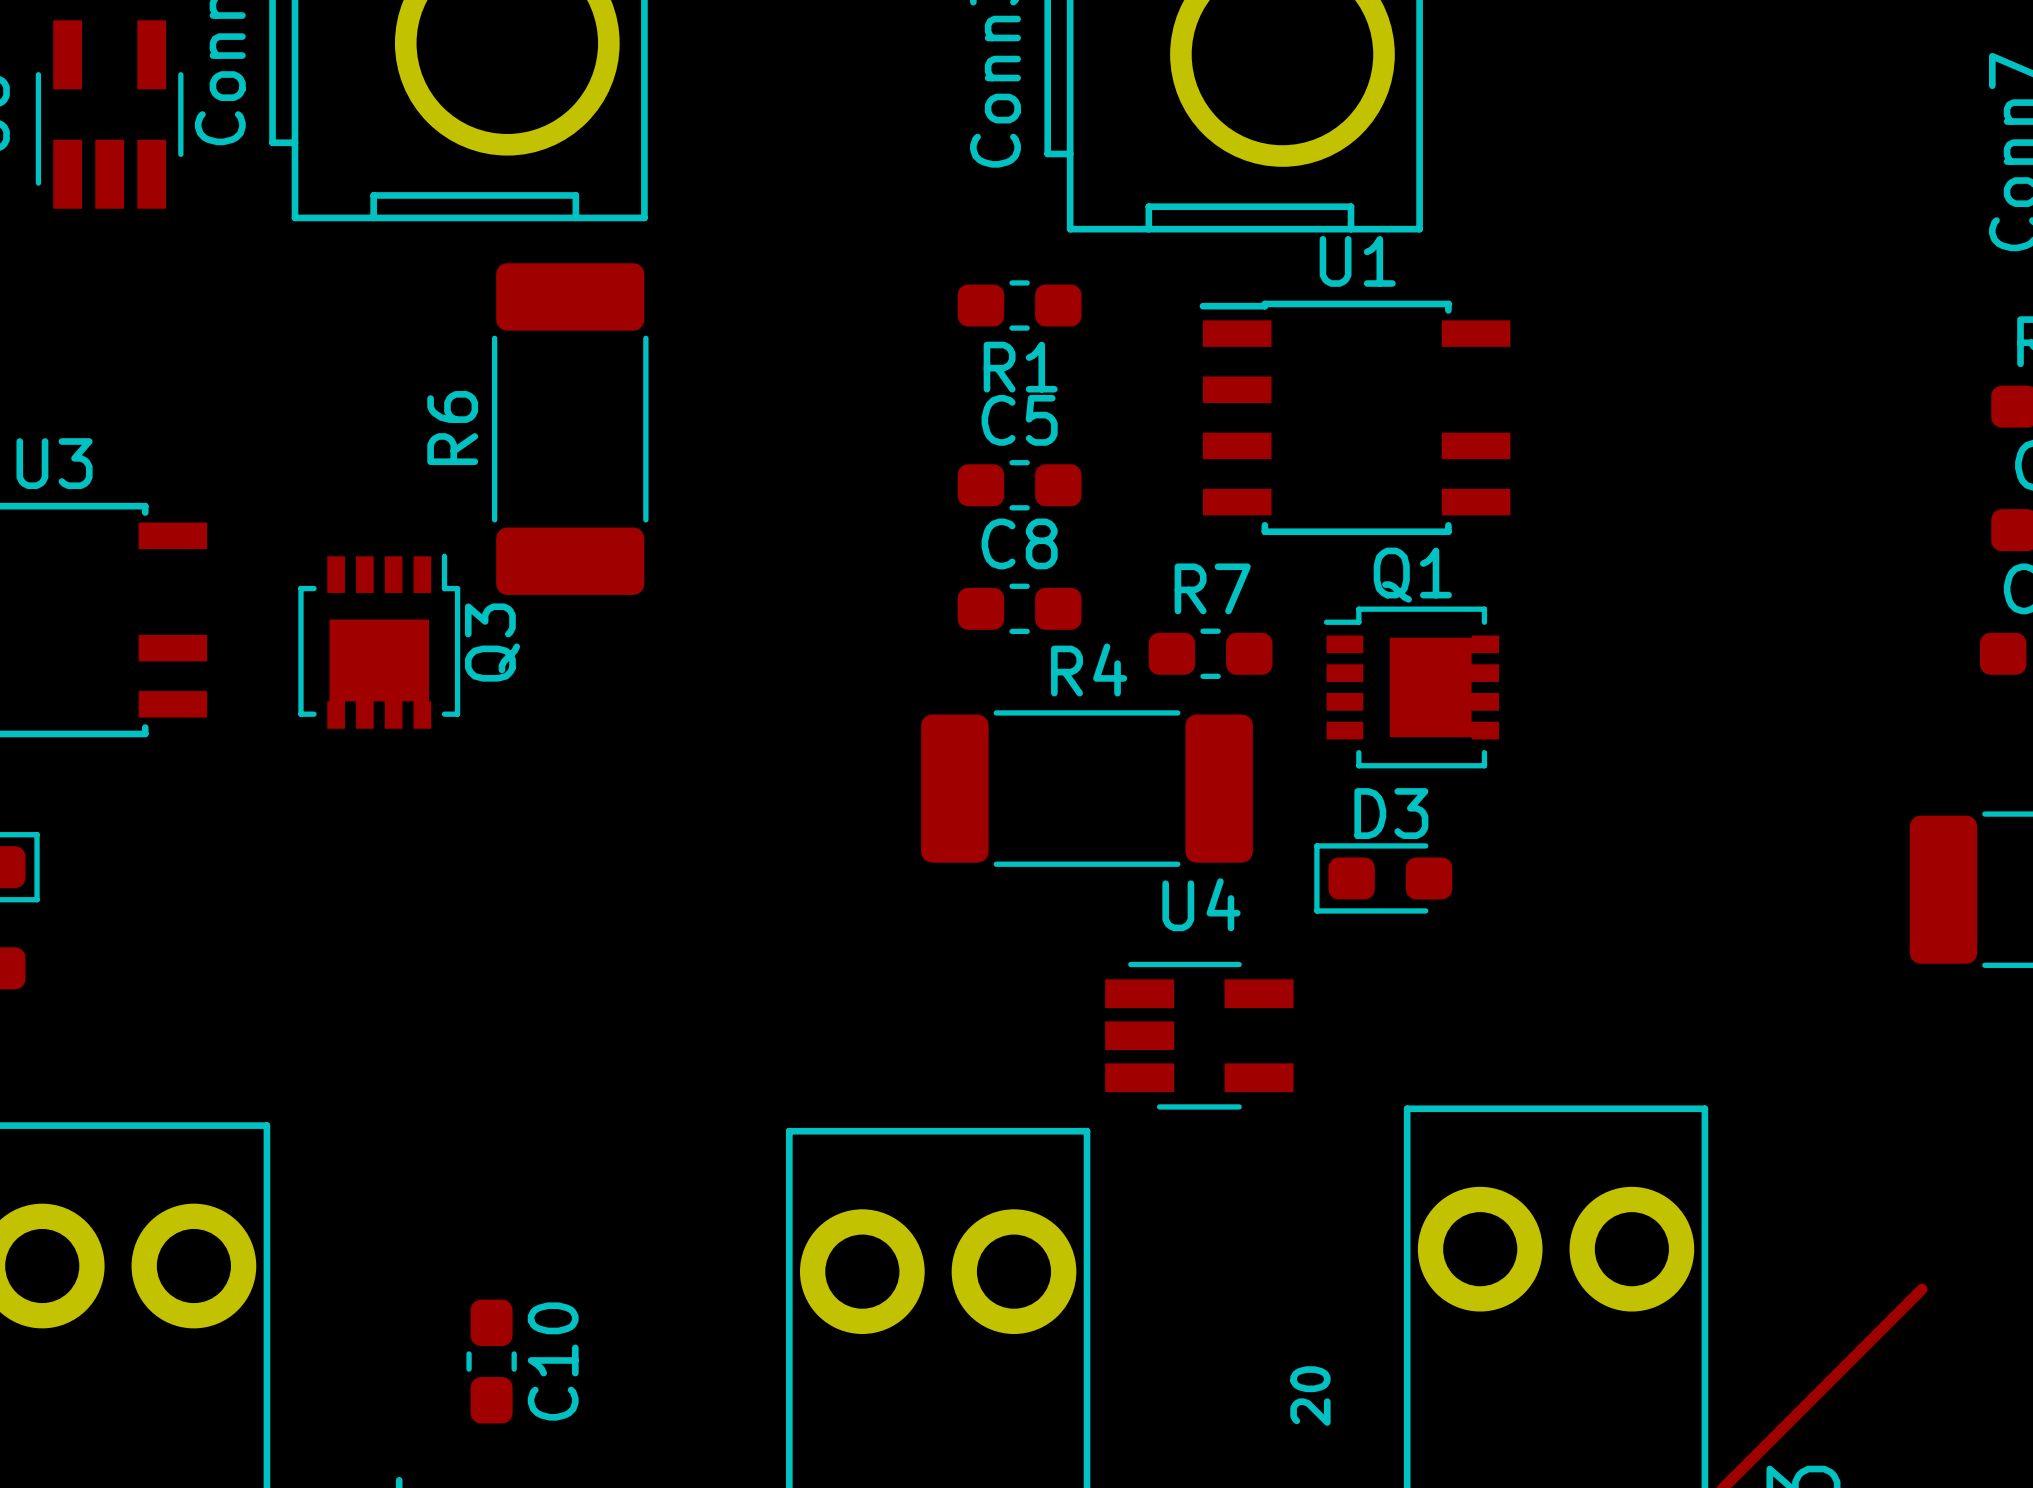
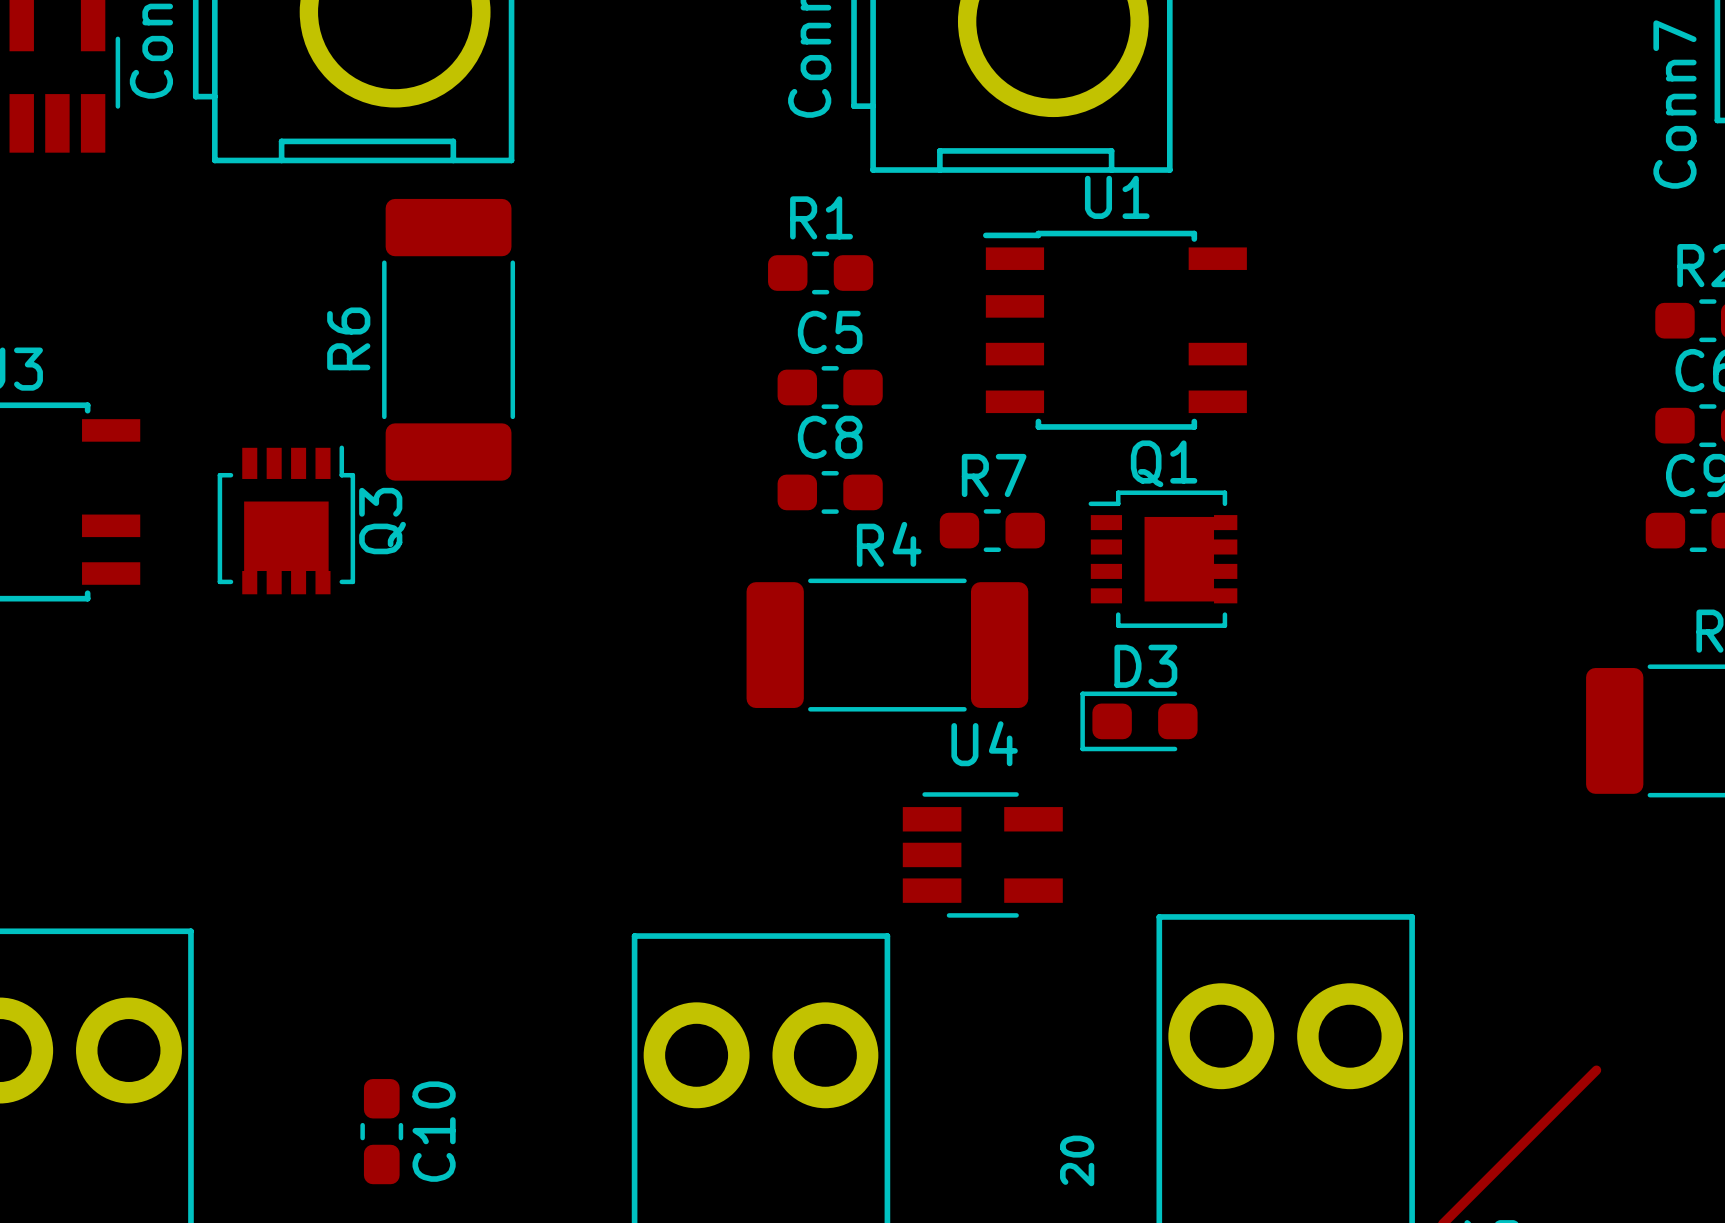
R1 position: (1019, 305) -> (820, 273)
R1 name position: R1 (1020, 367) -> R1 (821, 217)

